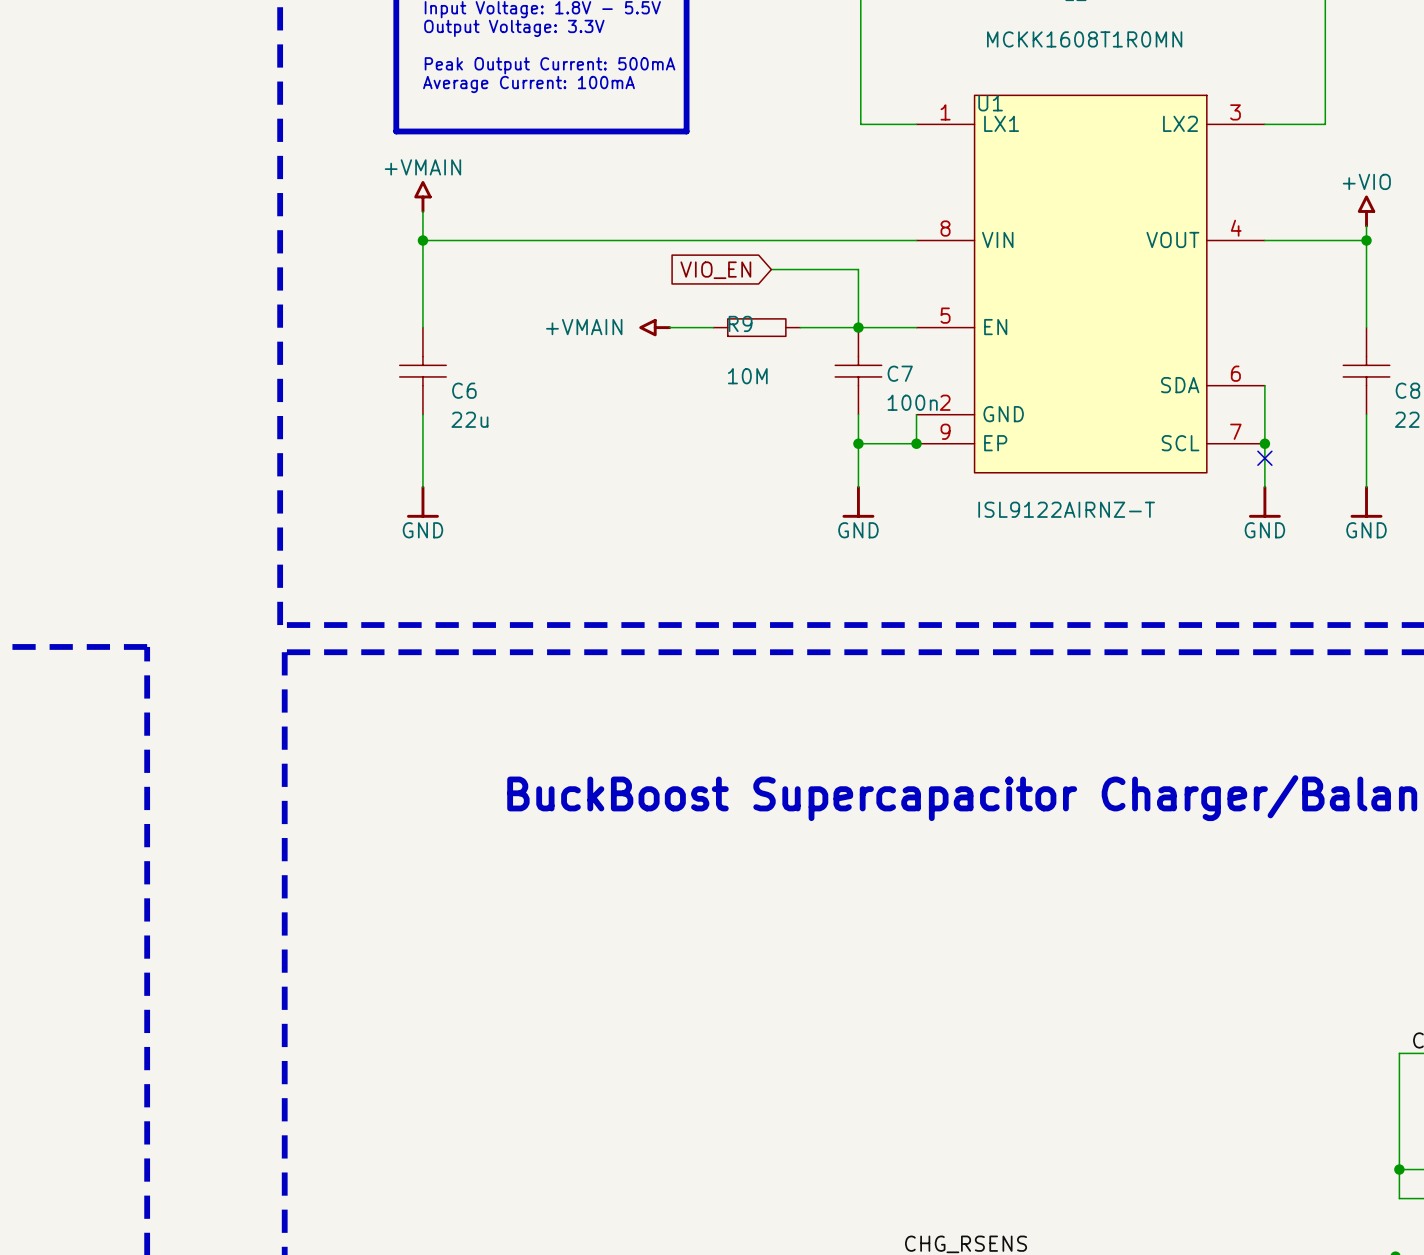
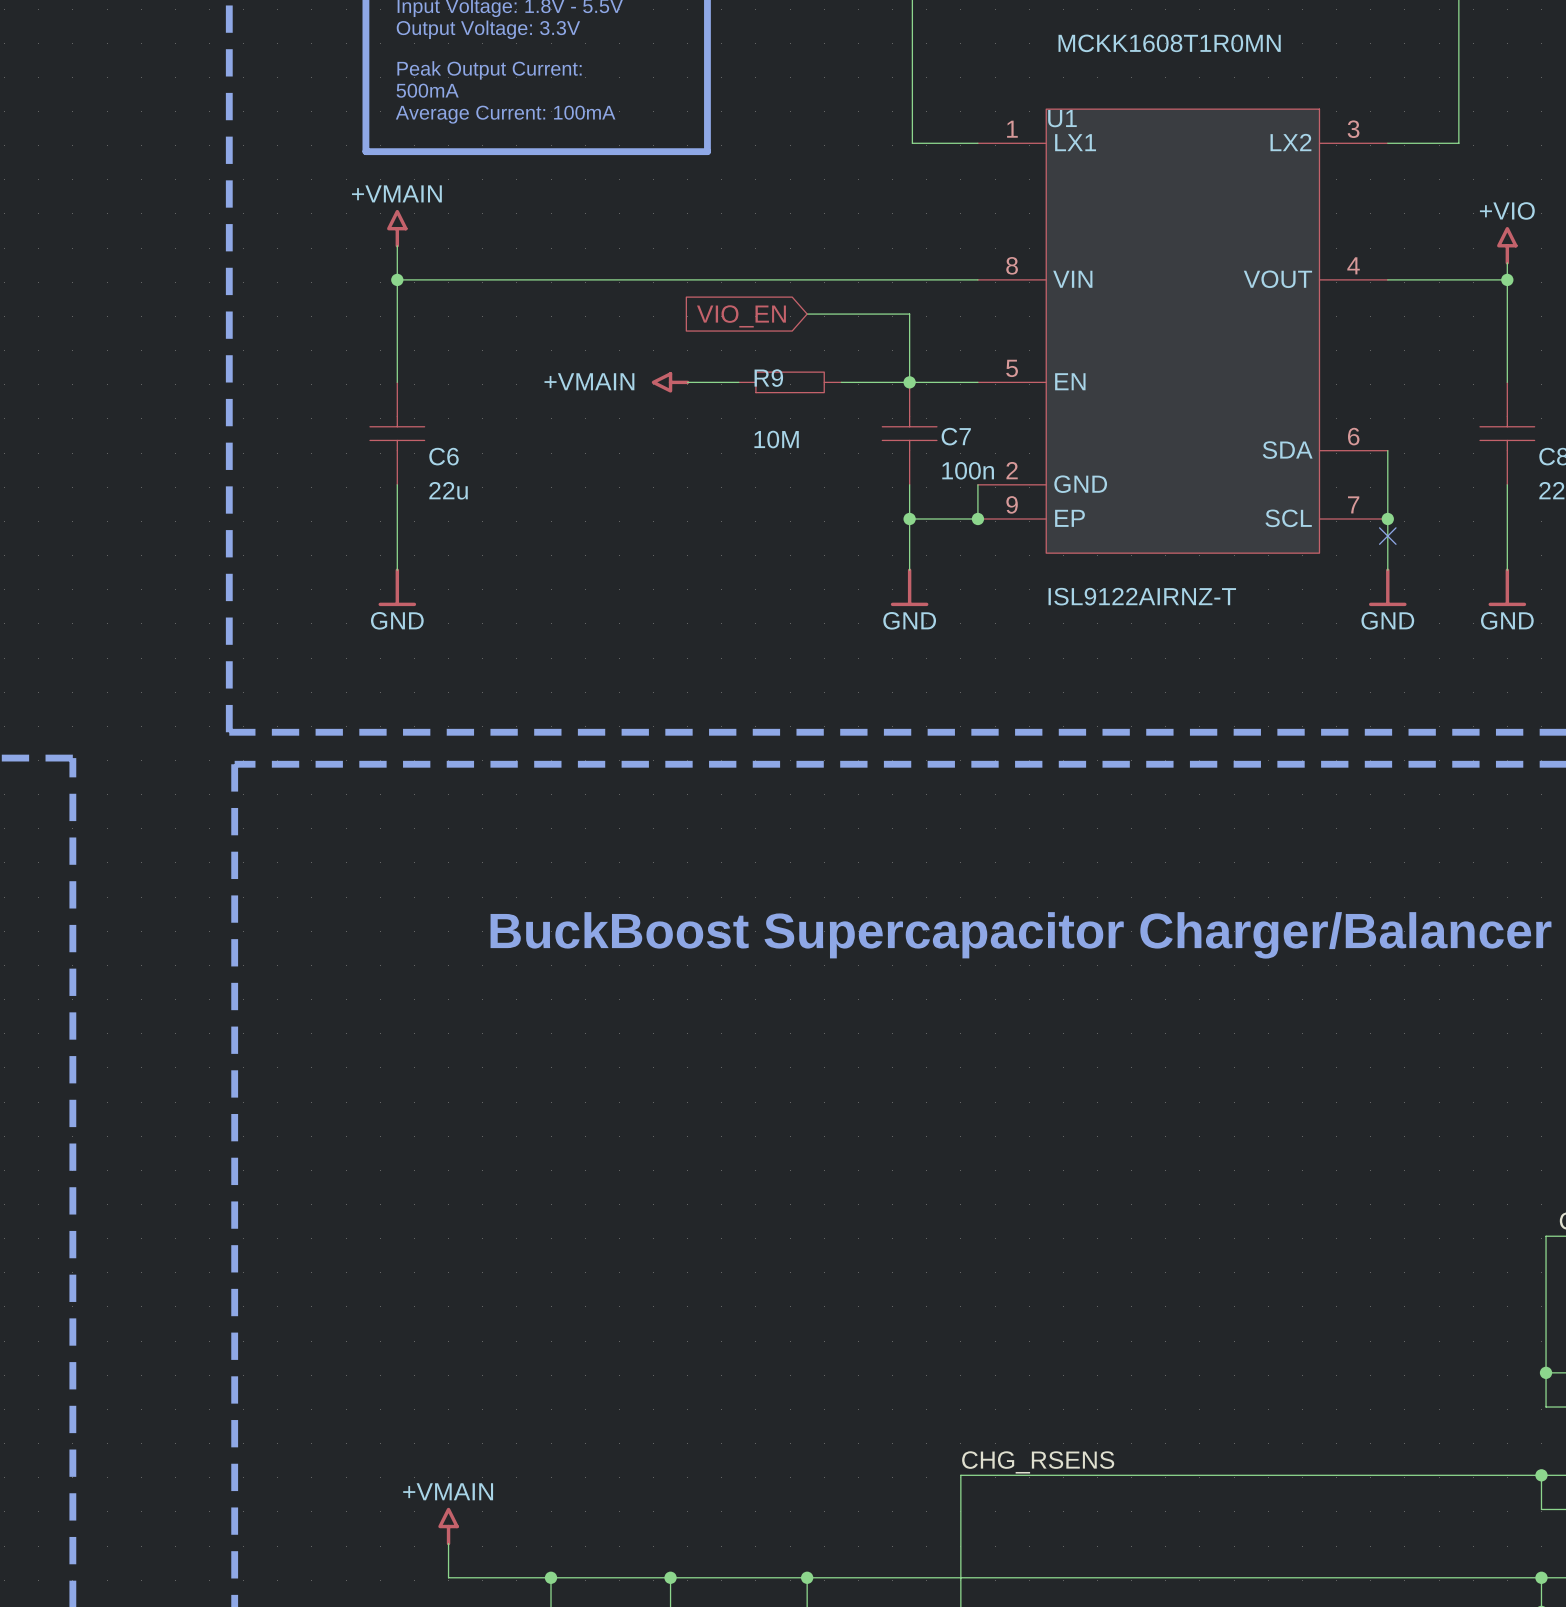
text: Peak Output Current: 500mA (550, 65) -> Peak Output Current: (489, 70)
text: Average Current: 100mA (528, 84) -> 500mA (427, 90)
text: none -> Average Current: 100mA (505, 114)

